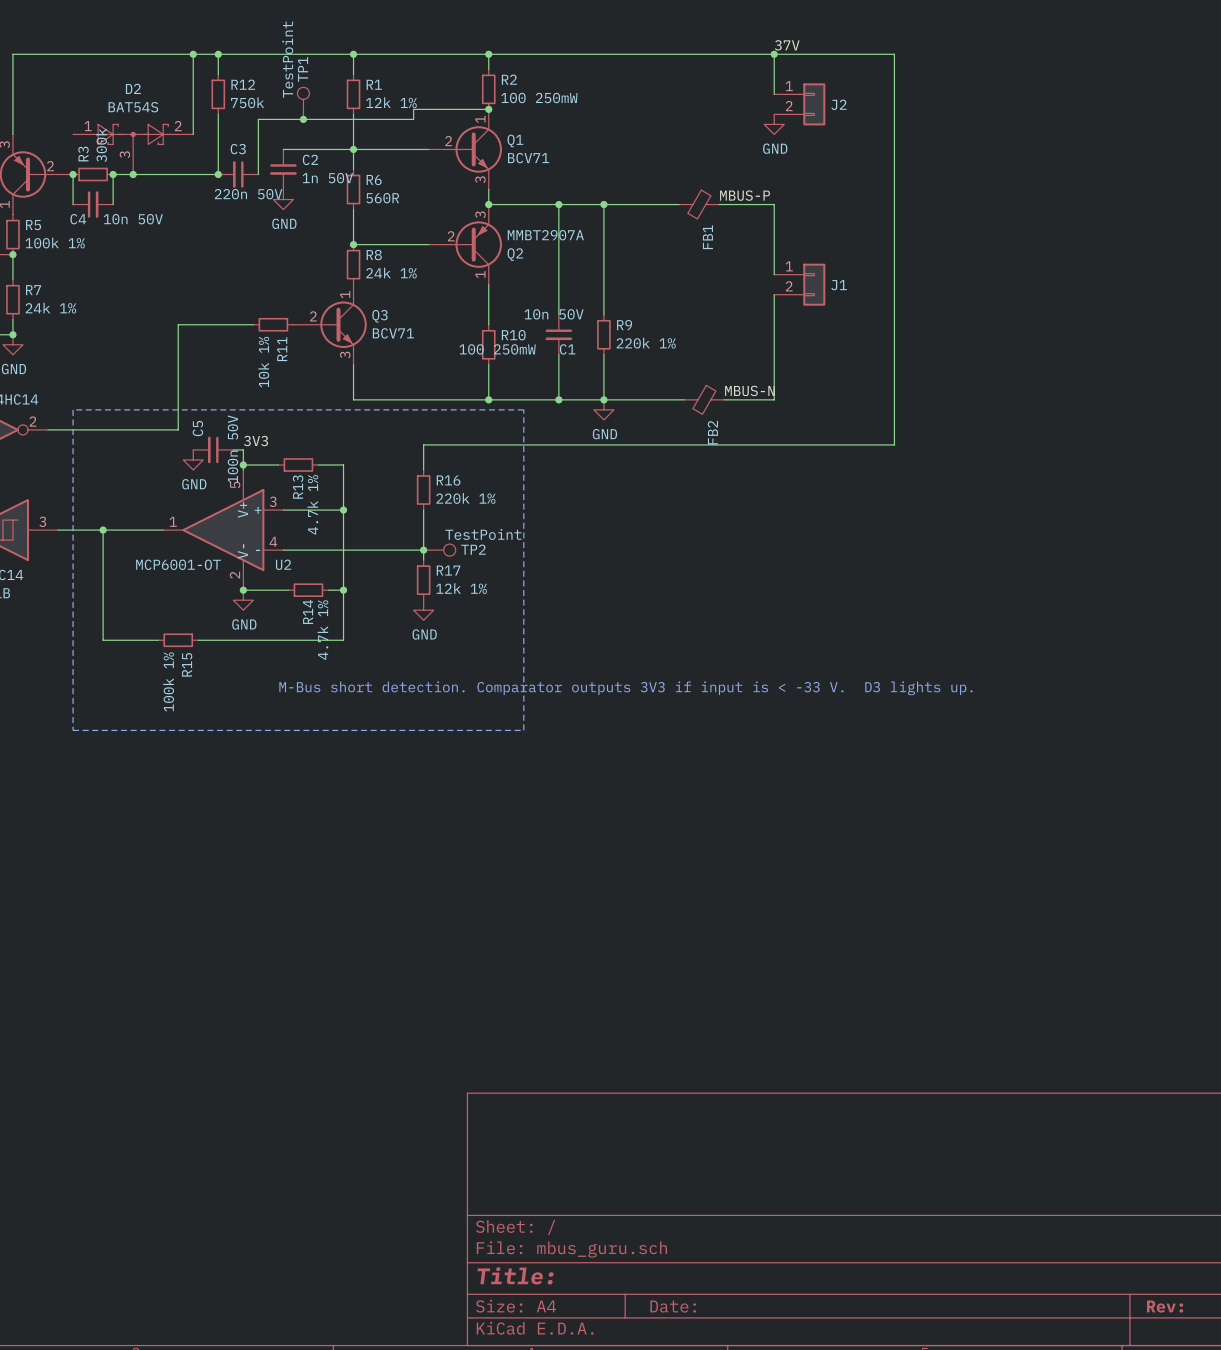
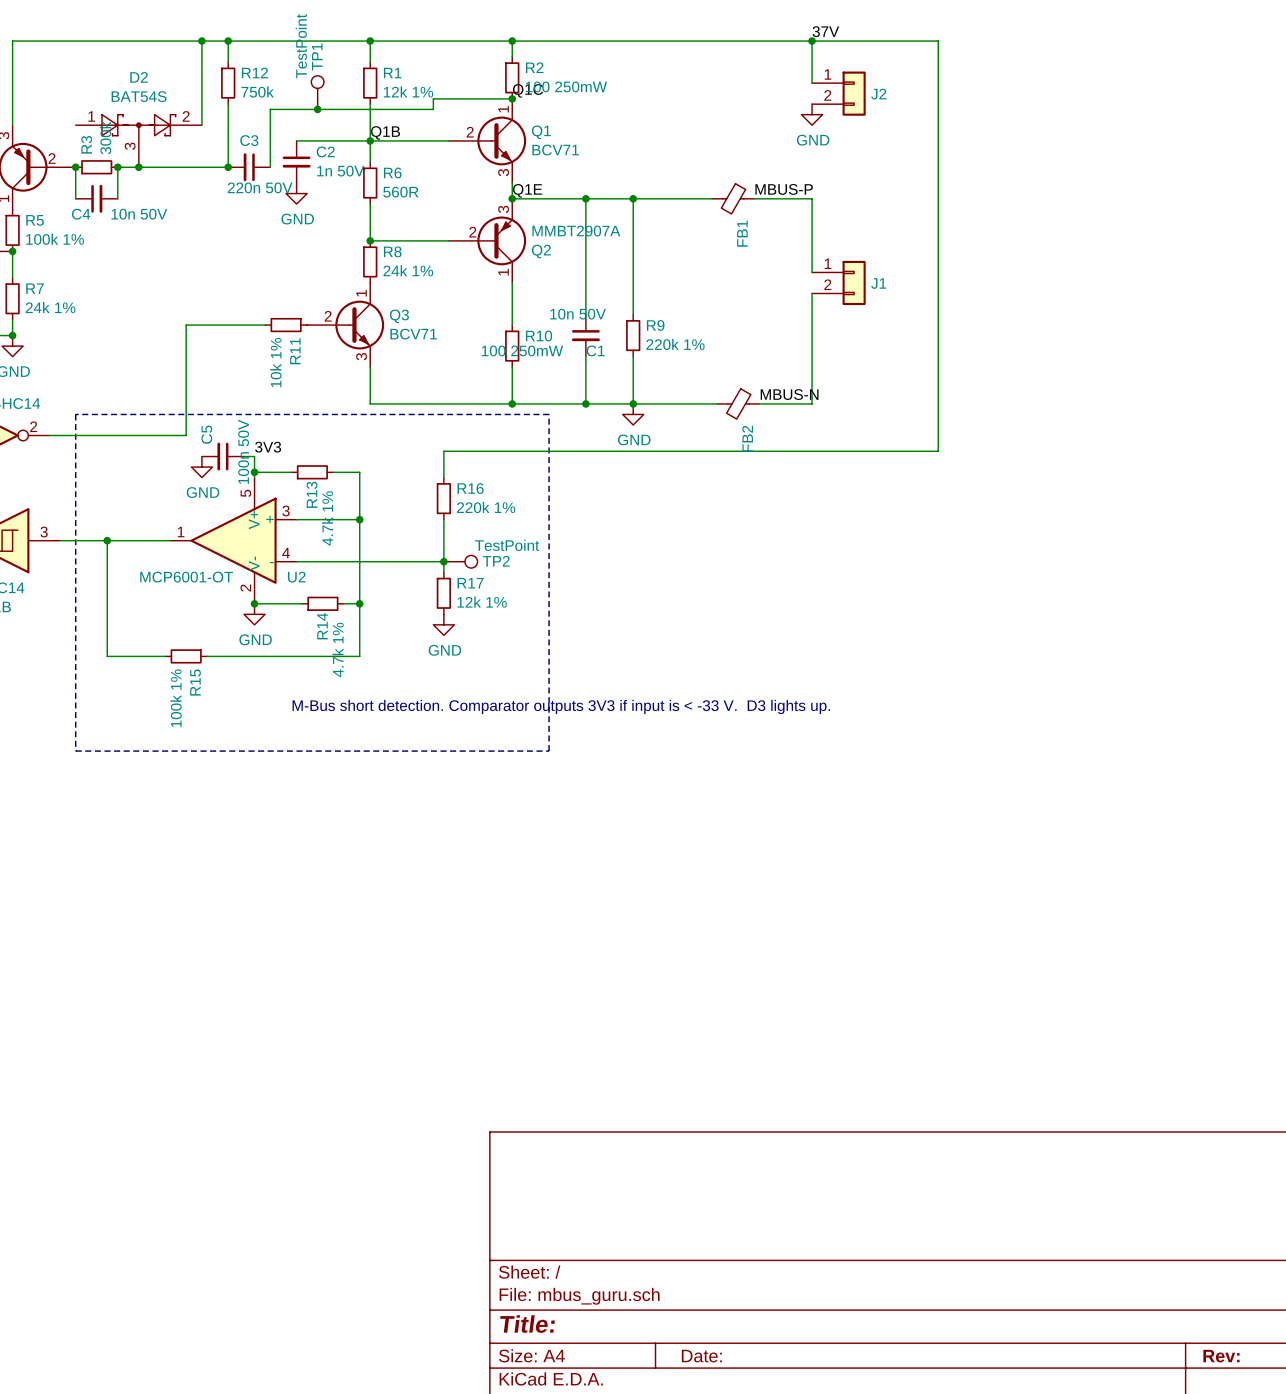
label: none -> Q1C (528, 90)
label: none -> Q1B (385, 132)
label: none -> Q1E (527, 190)

